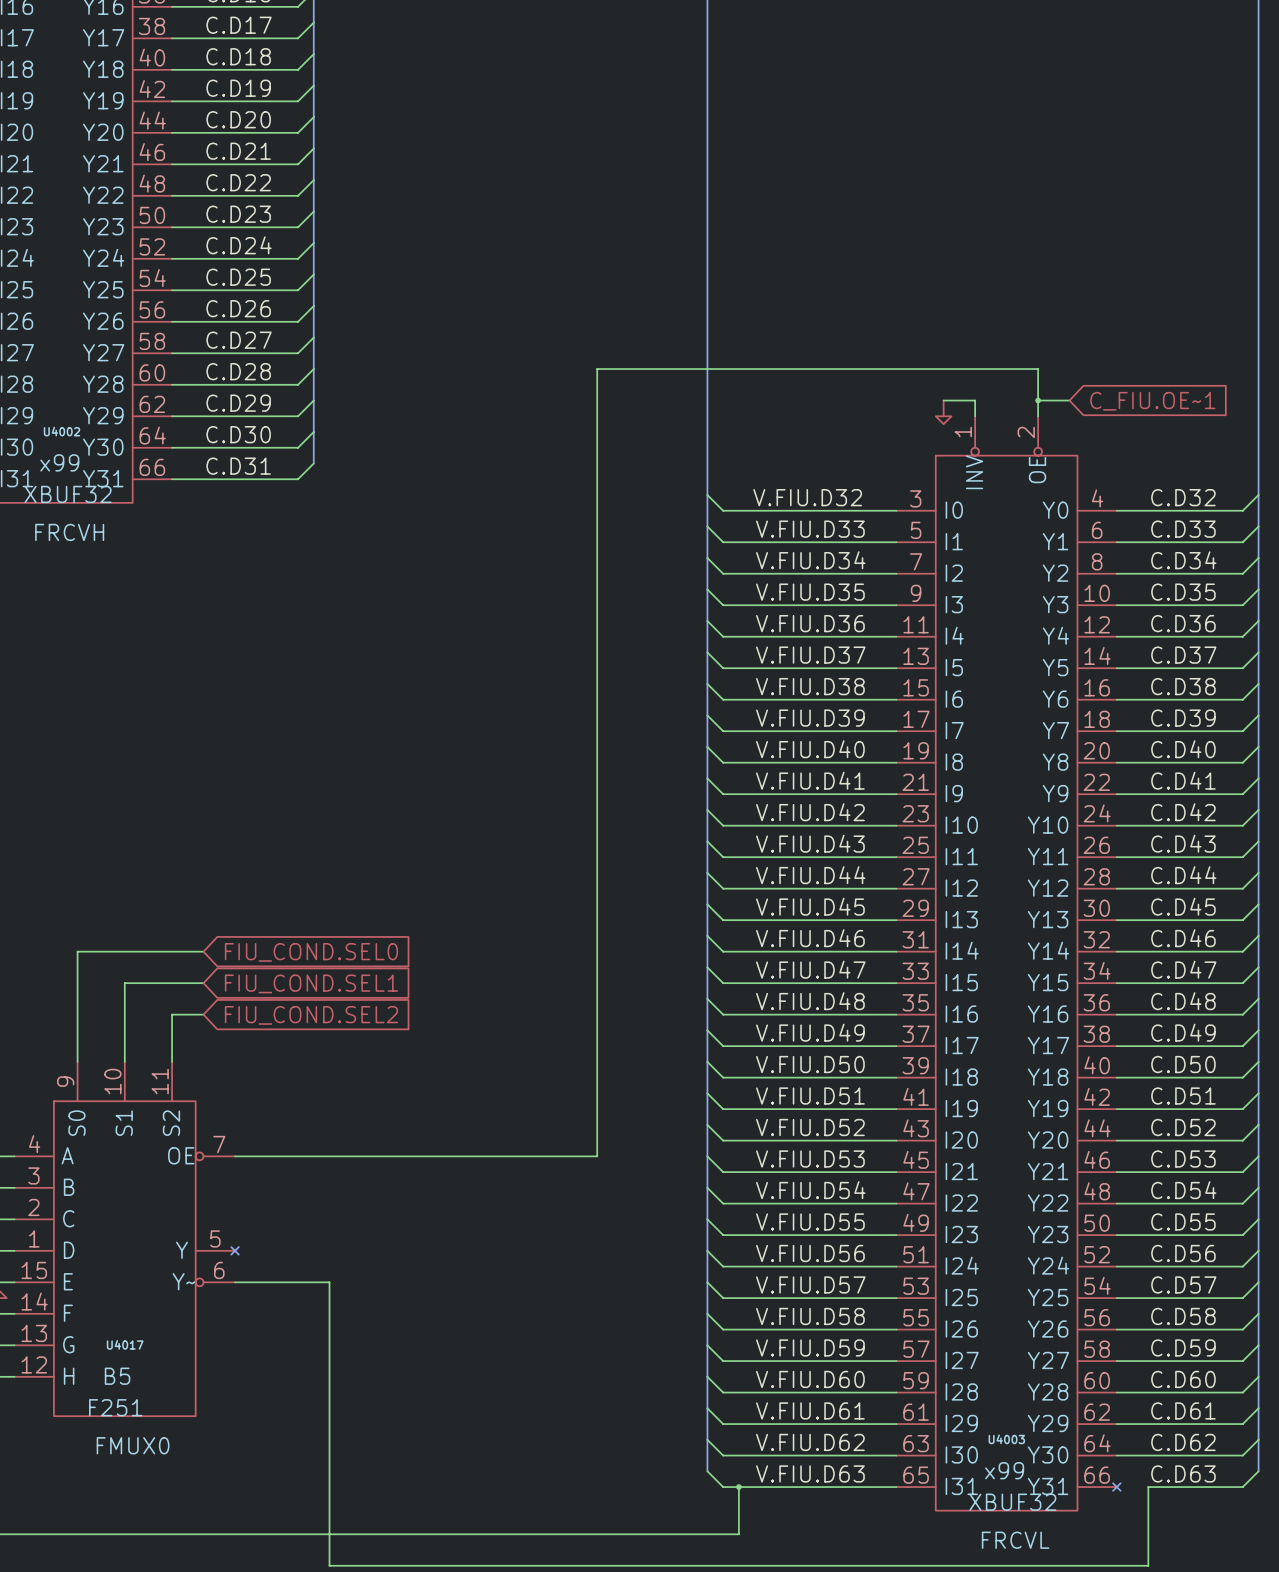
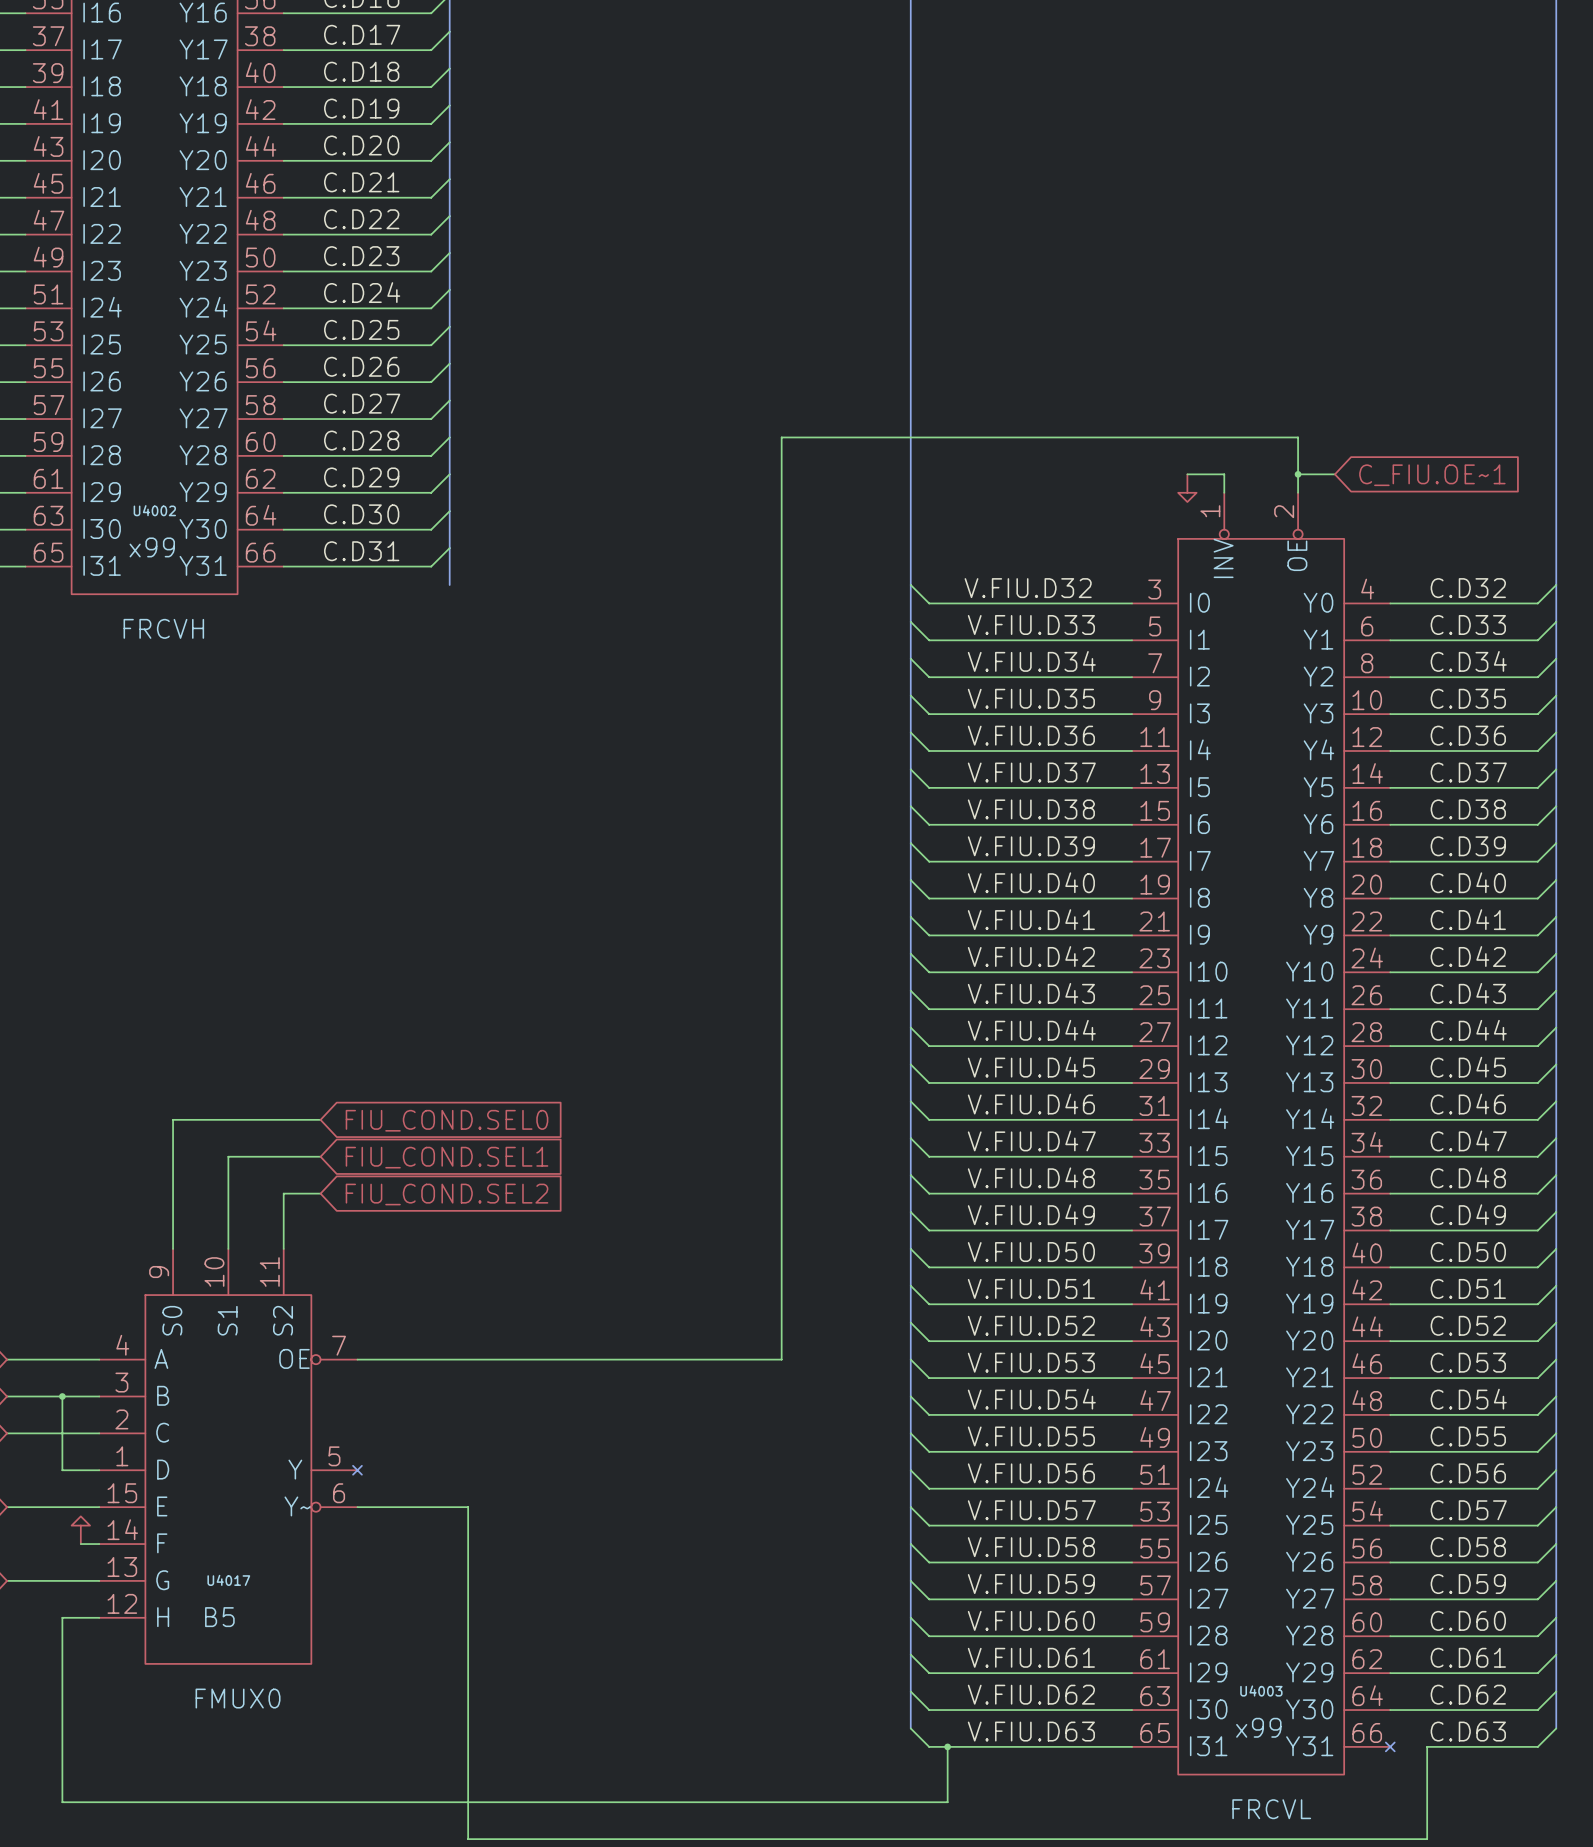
bus: none -> (449, 548) (449, 585)
U4002 value: XBUF32 (68, 494) -> none
U4017 value: F251 (115, 1407) -> none
U4003 value: XBUF32 (1012, 1502) -> none

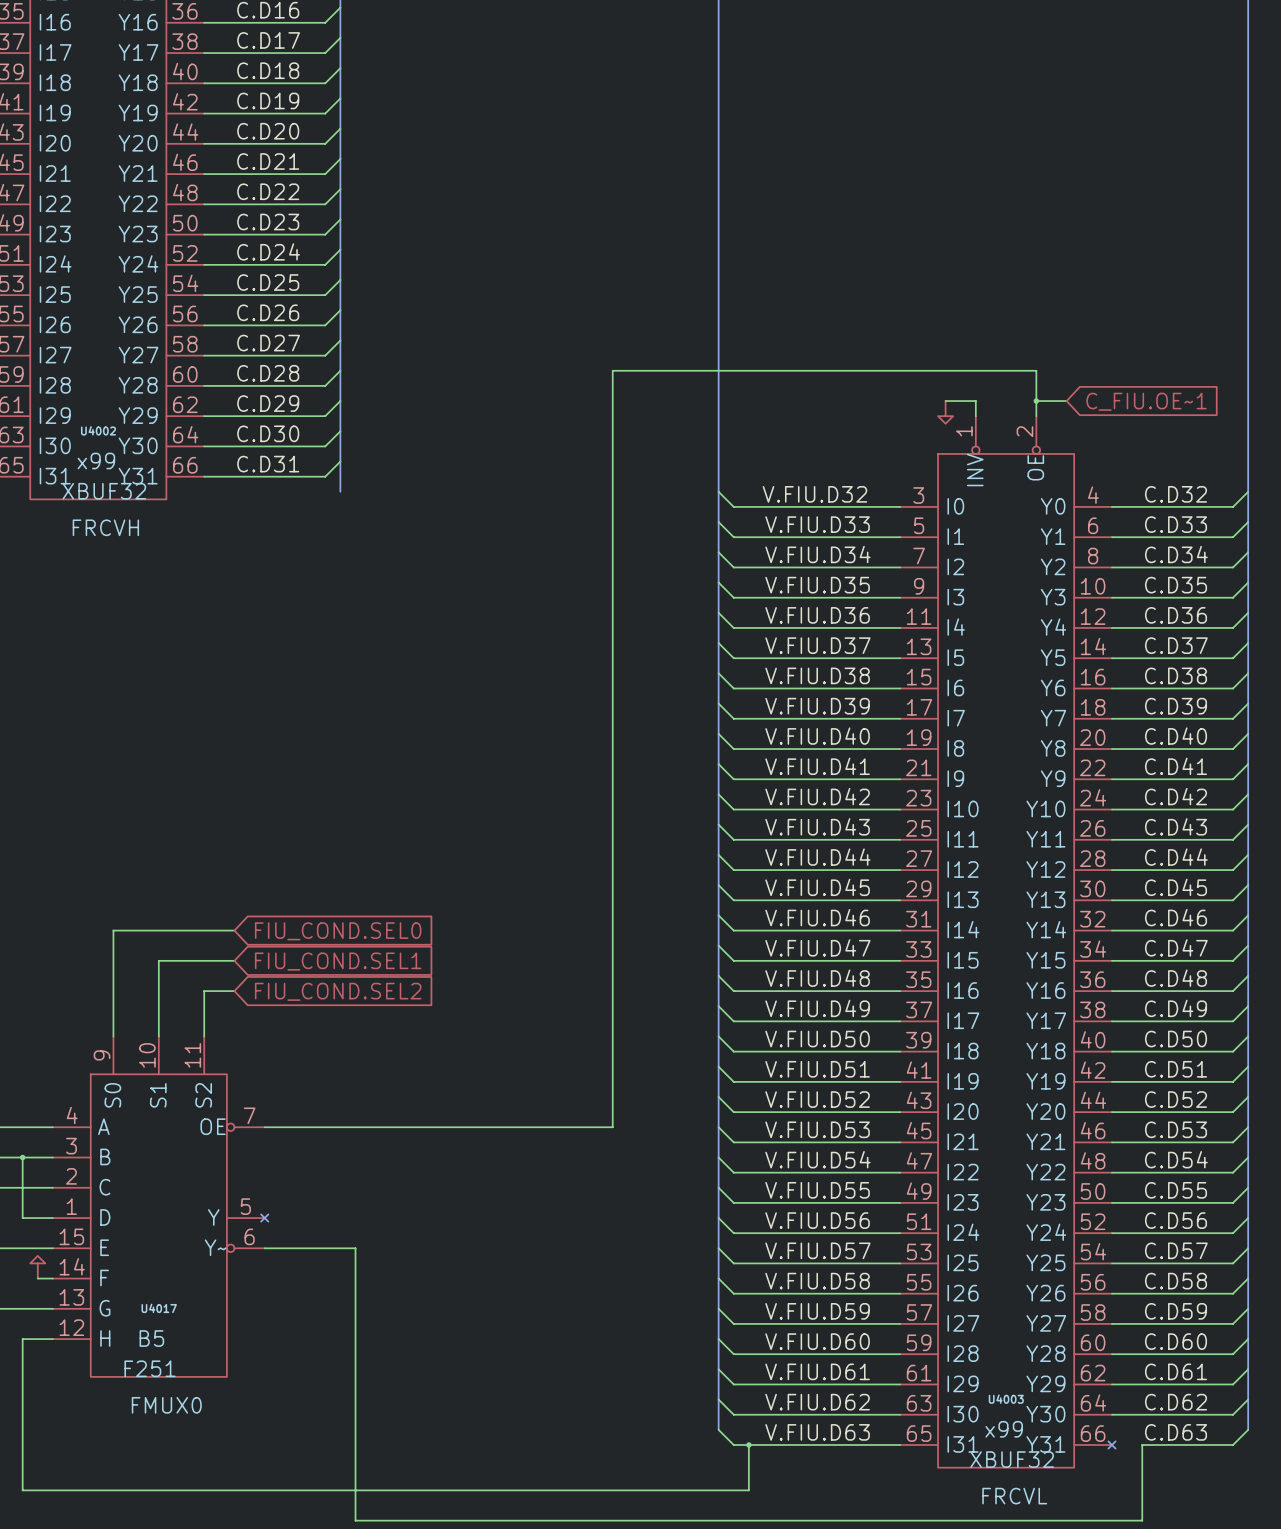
U4002 value: none -> XBUF32 (104, 491)
U4017 value: none -> F251 (150, 1368)
U4003 value: none -> XBUF32 (1012, 1459)

